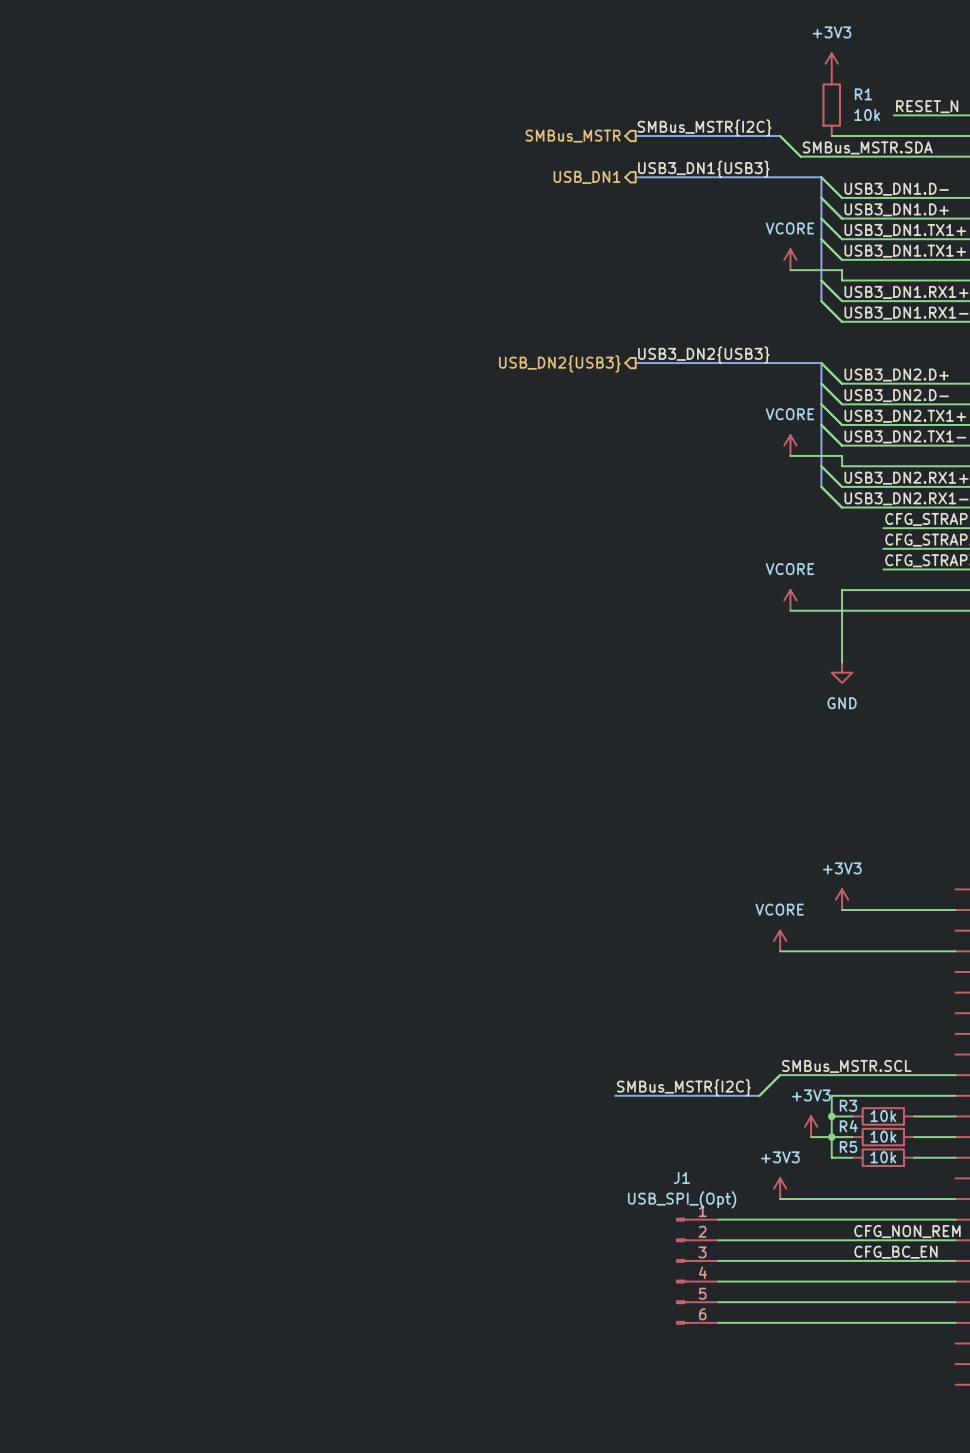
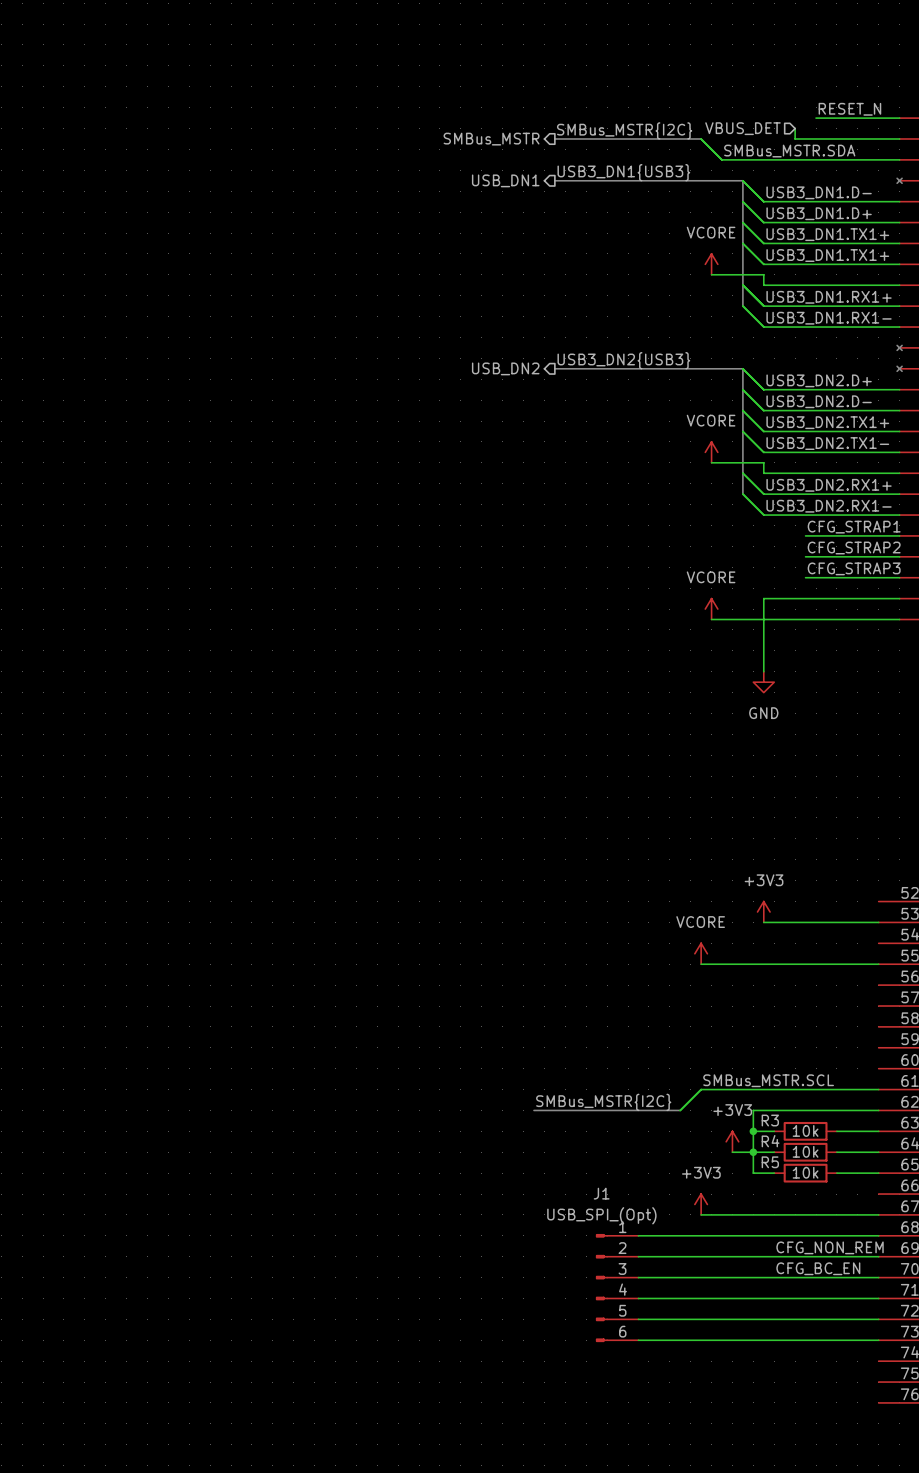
power symbol: +3V3 (831, 63) -> none
R1: 10k (831, 105) -> none
hierarchical label: none -> VBUS_DET (742, 128)
wire: (831, 136) (873, 136) -> (795, 128) (795, 138)
hierarchical label: USB_DN2{USB3} (559, 363) -> USB_DN2 (505, 368)

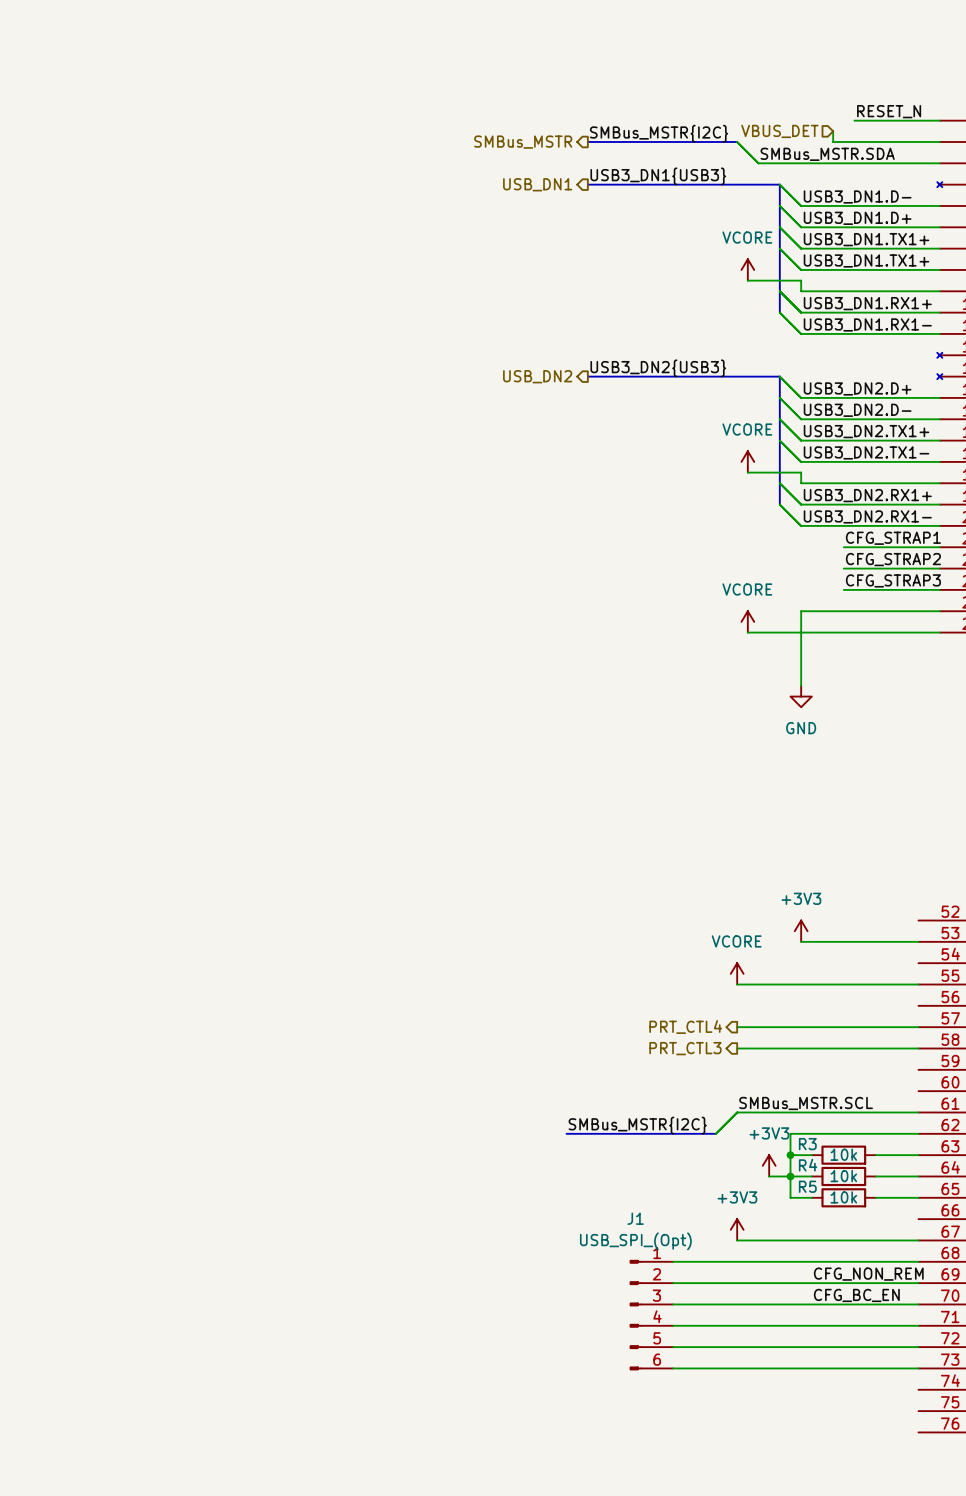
hierarchical label: none -> PRT_CTL4 (685, 1027)
wire: none -> (737, 1027) (918, 1027)
wire: none -> (737, 1048) (918, 1048)
hierarchical label: none -> PRT_CTL3 (685, 1048)

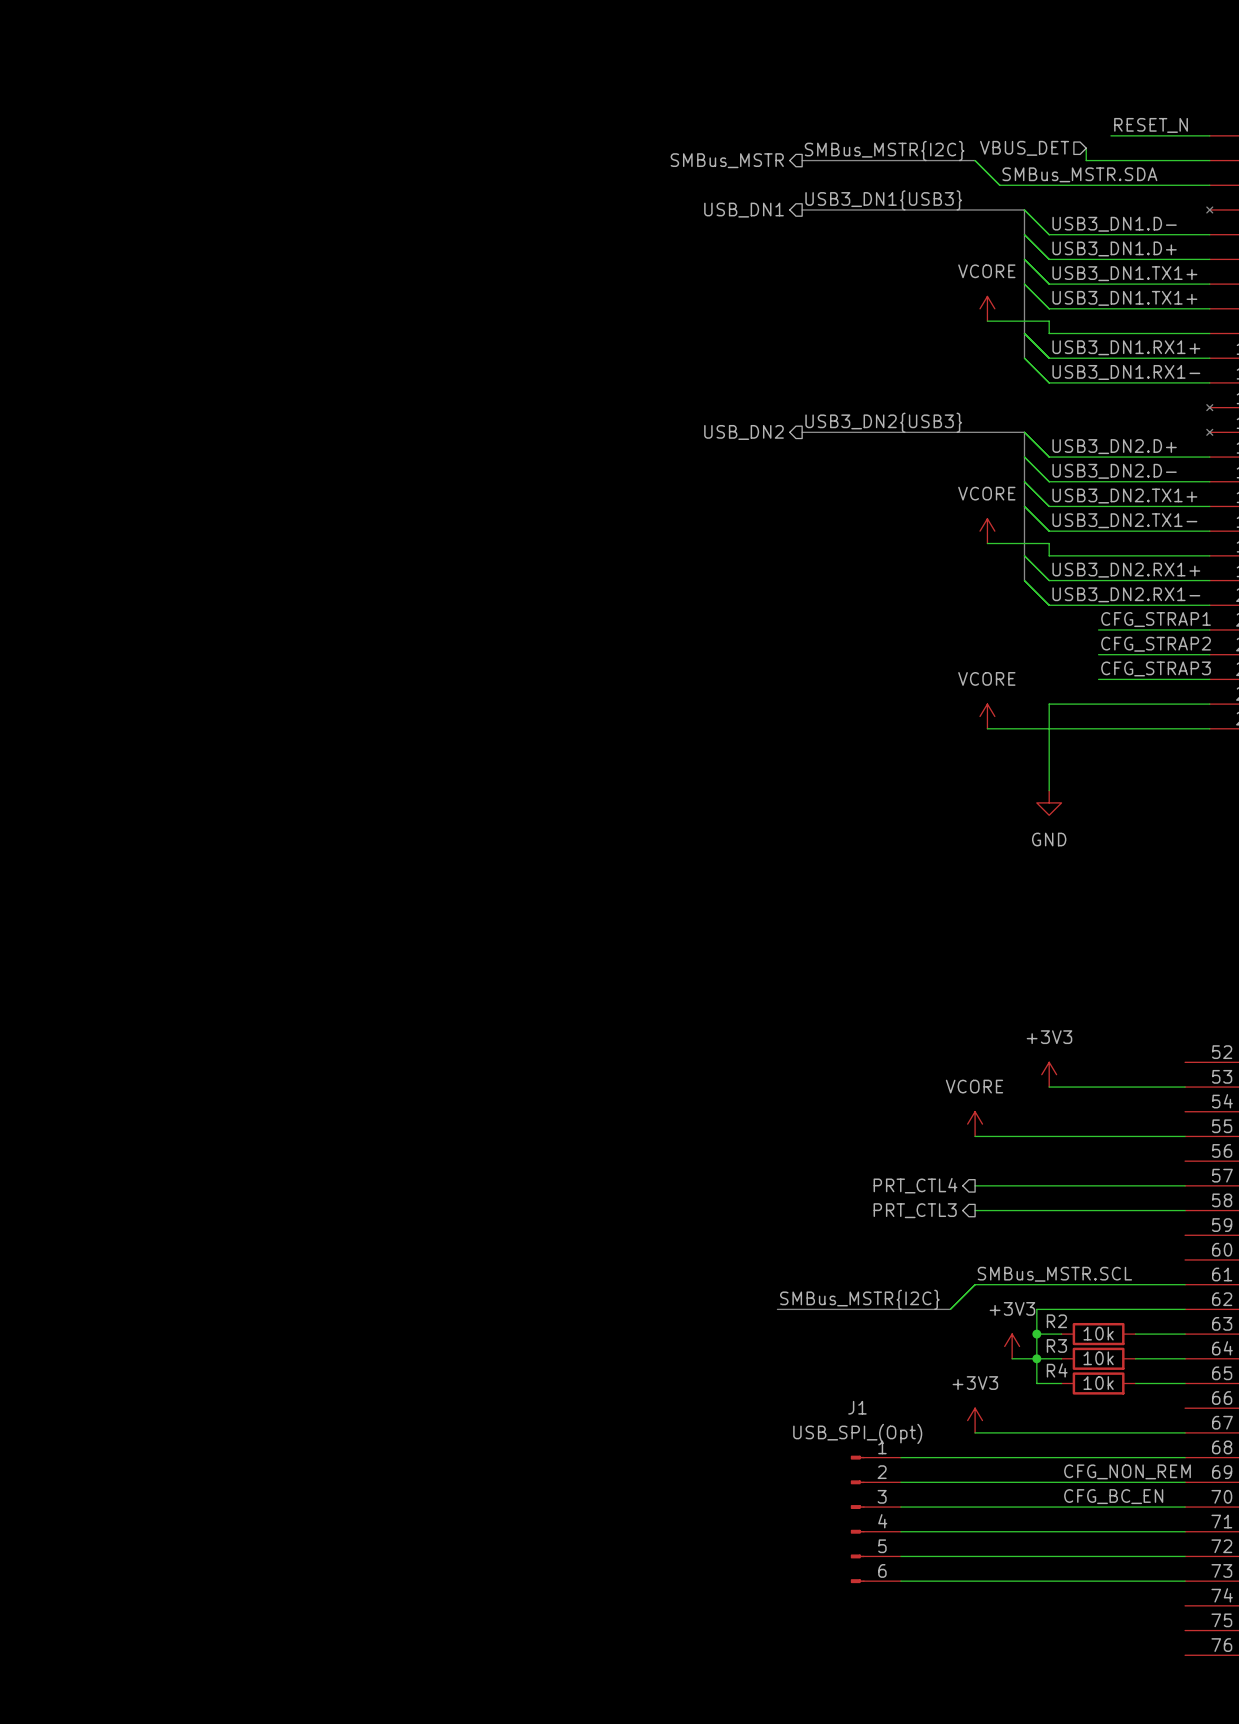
R3 name: R3 (807, 1144) -> R2 (1056, 1321)
R4 name: R4 (808, 1165) -> R3 (1056, 1345)
R5 name: R5 (807, 1186) -> R4 (1057, 1370)

